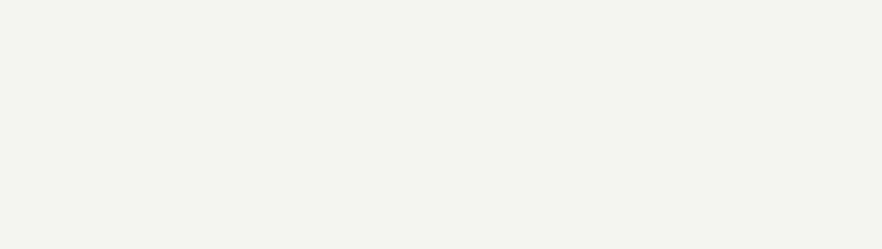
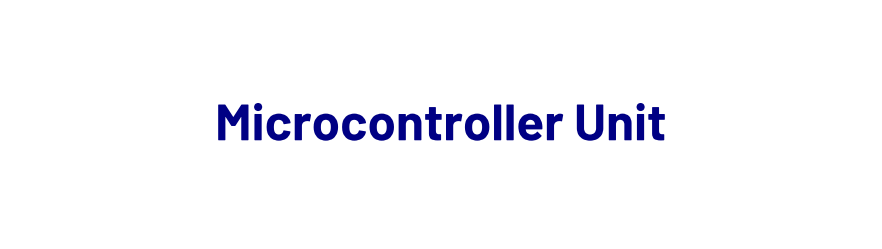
text: none -> Microcontroller Unit (441, 121)

